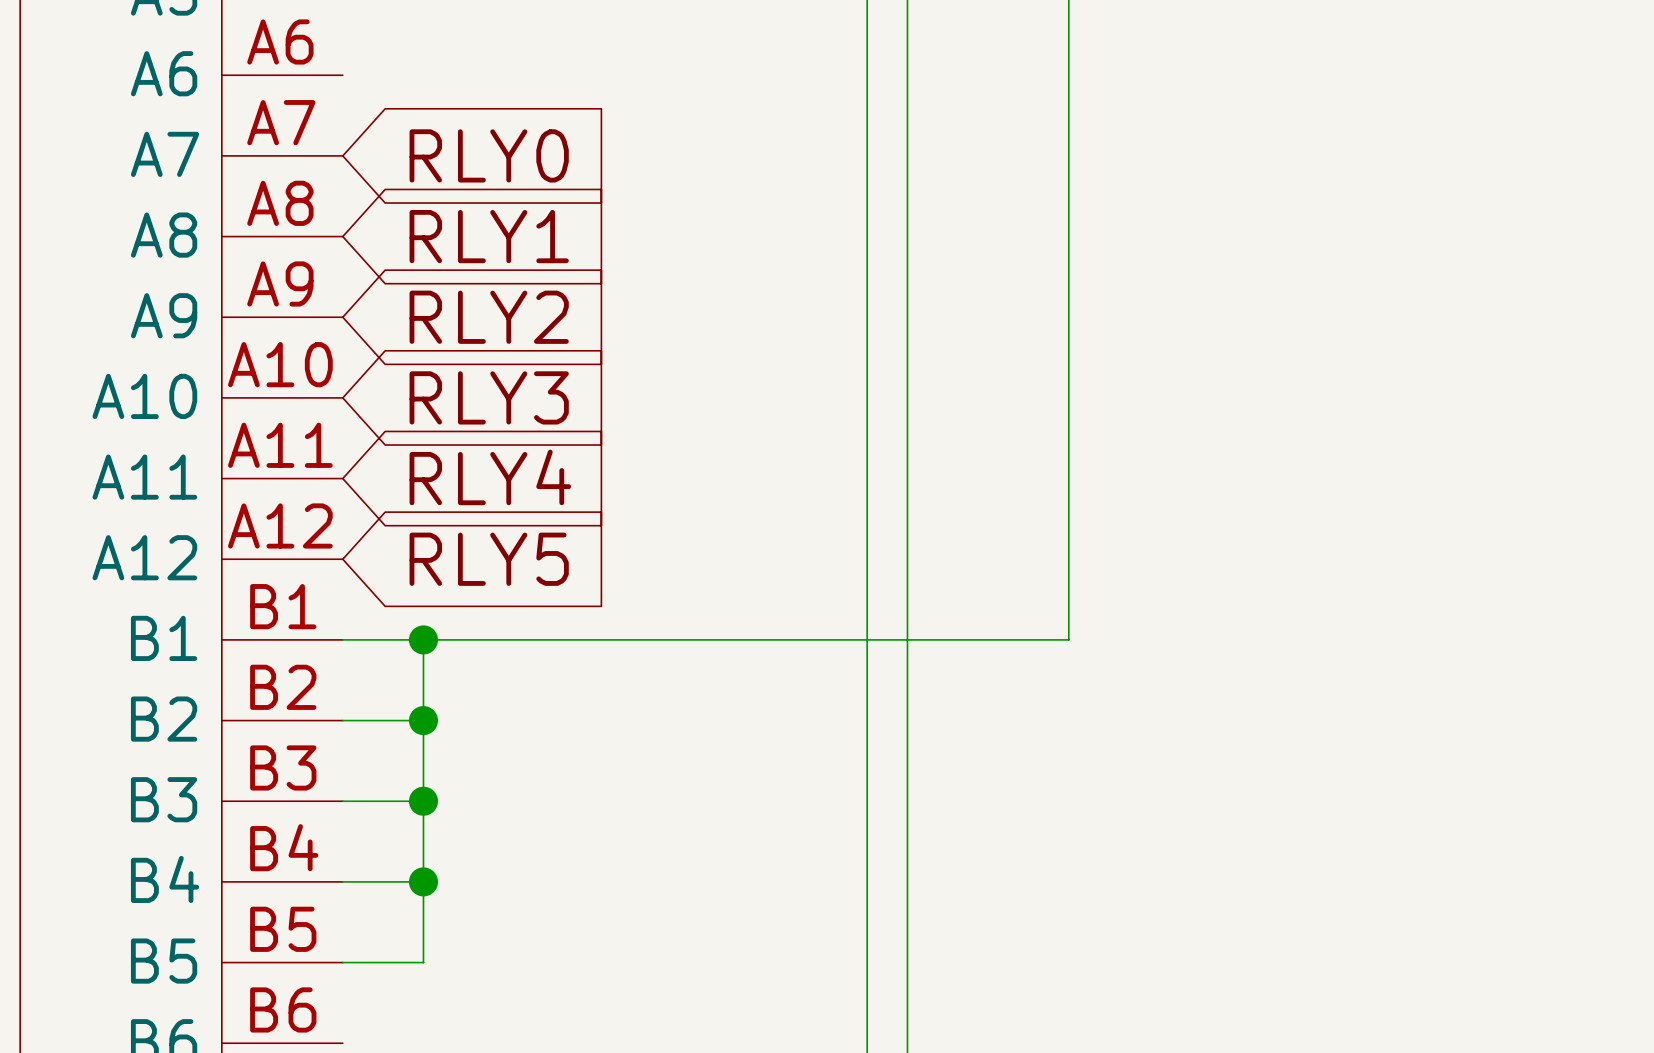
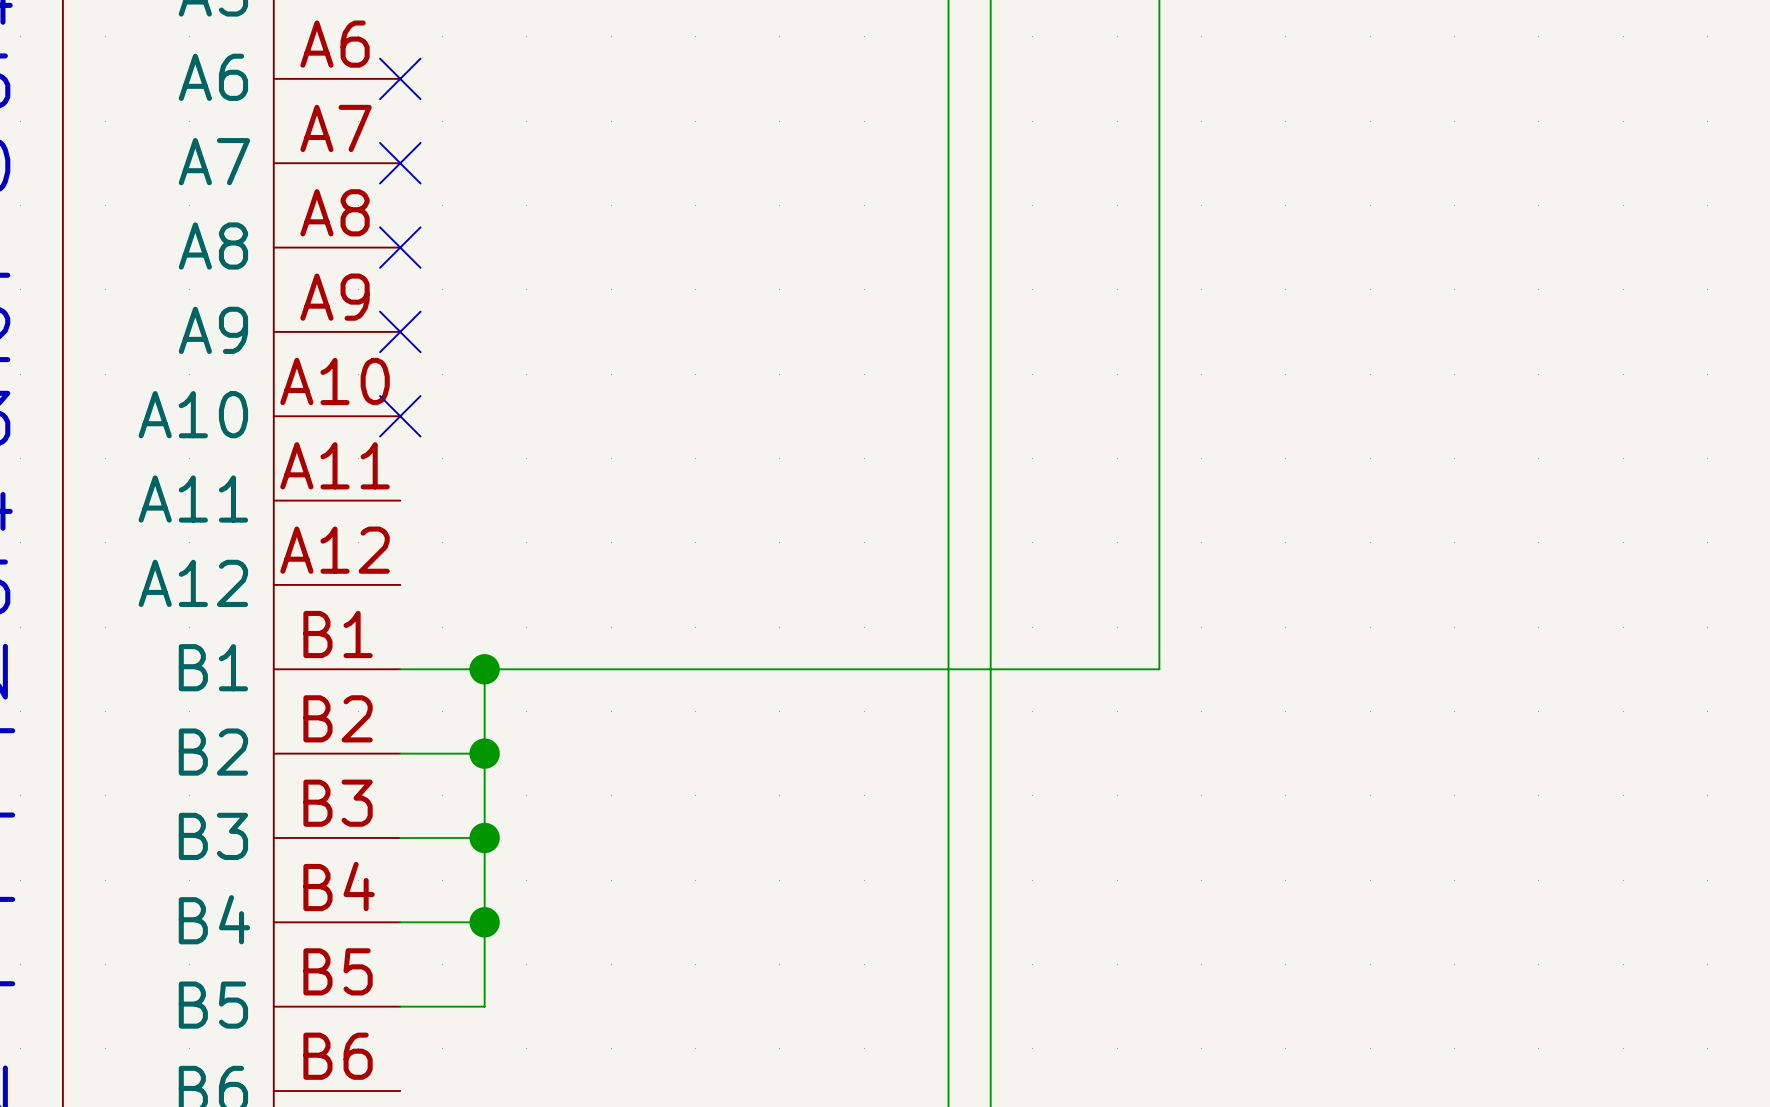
no-connect mark: none -> (400, 78)
no-connect mark: none -> (400, 163)
global label: RLY0 (489, 155) -> none
no-connect mark: none -> (400, 247)
global label: RLY1 (489, 236) -> none
no-connect mark: none -> (400, 331)
global label: RLY2 (489, 317) -> none
no-connect mark: none -> (400, 416)
global label: RLY3 (489, 397) -> none
global label: RLY4 (490, 477) -> none
global label: RLY5 (489, 559) -> none

